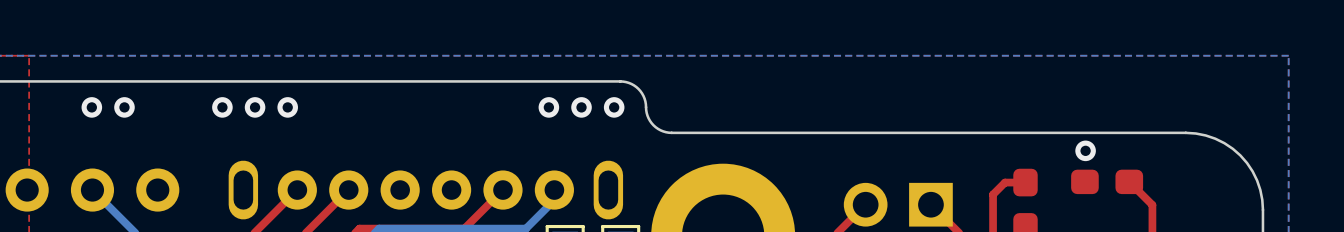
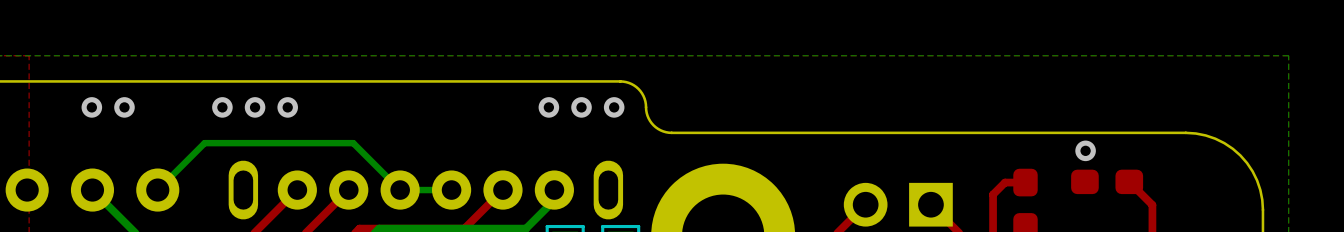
bottom track: none -> (451, 190) (400, 190) (353, 143) (204, 143) (157, 190)

